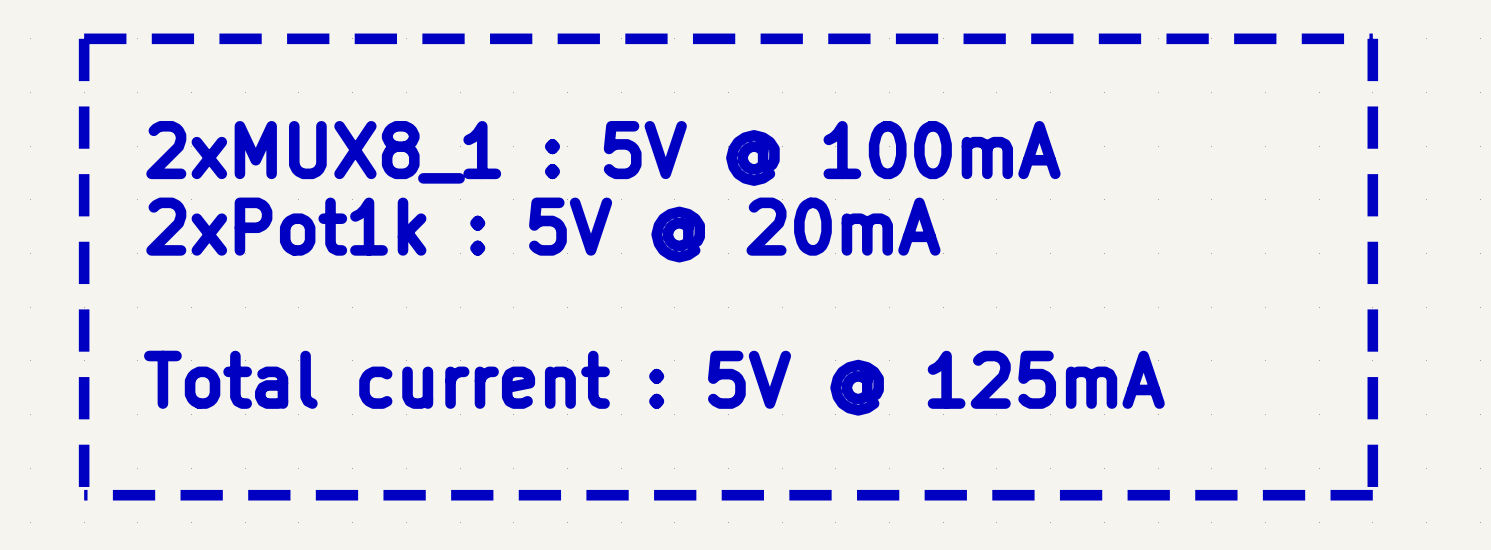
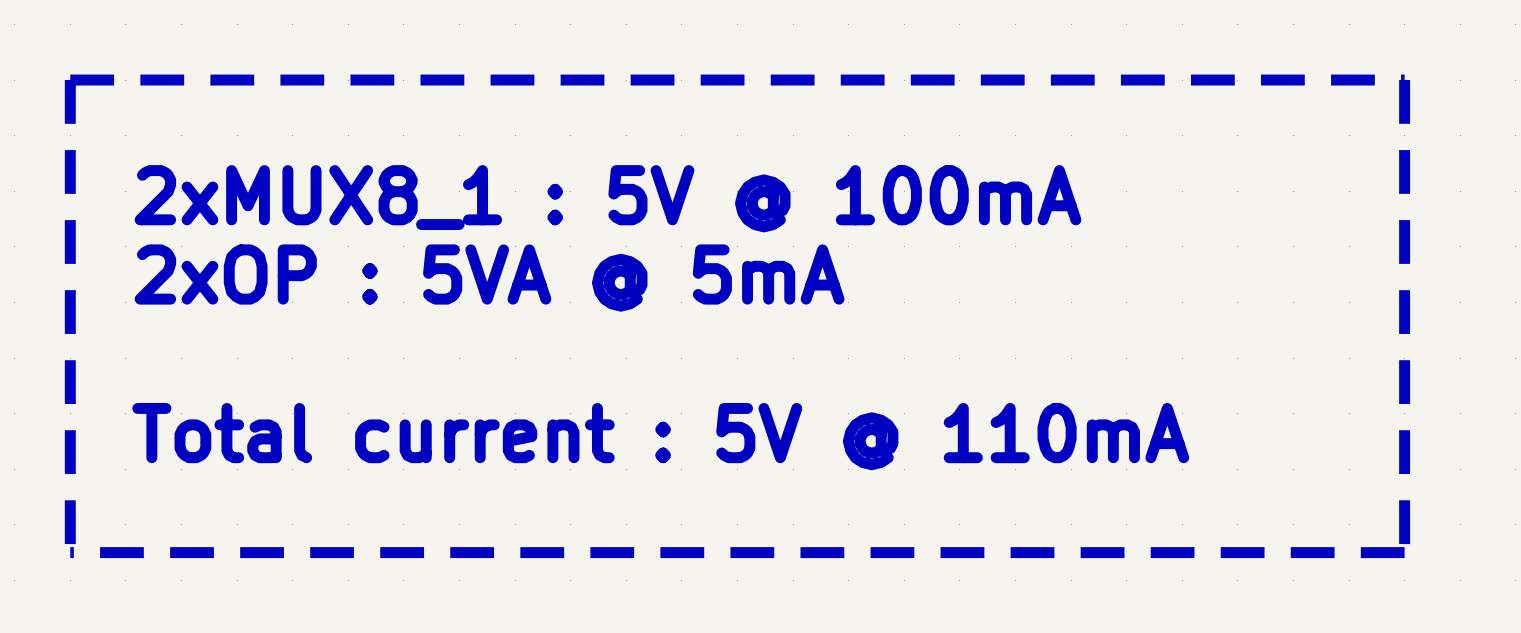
text: 2xPot1k : 5V @ 20mA (543, 230) -> 2xOP : 5VA @ 5mA (489, 278)
text: Total current : 5V @ 125mA (654, 383) -> Total current : 5V @ 110mA (660, 436)

